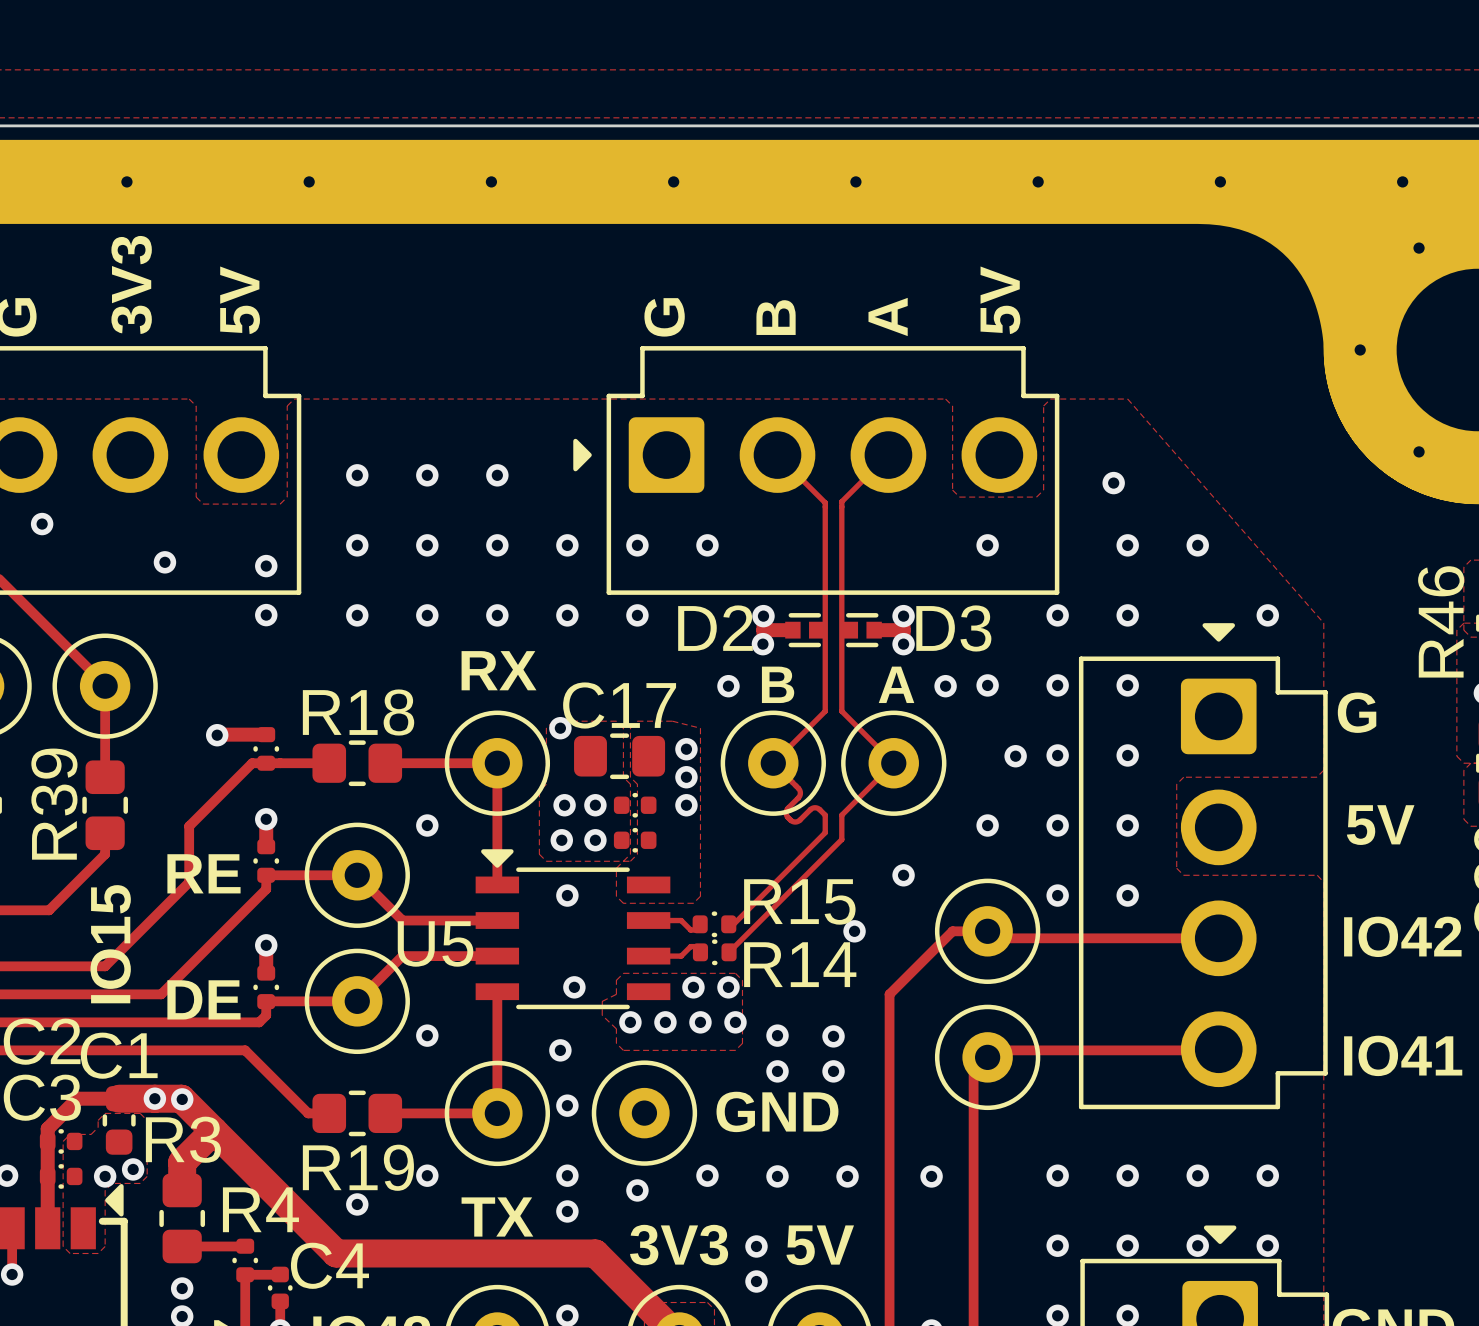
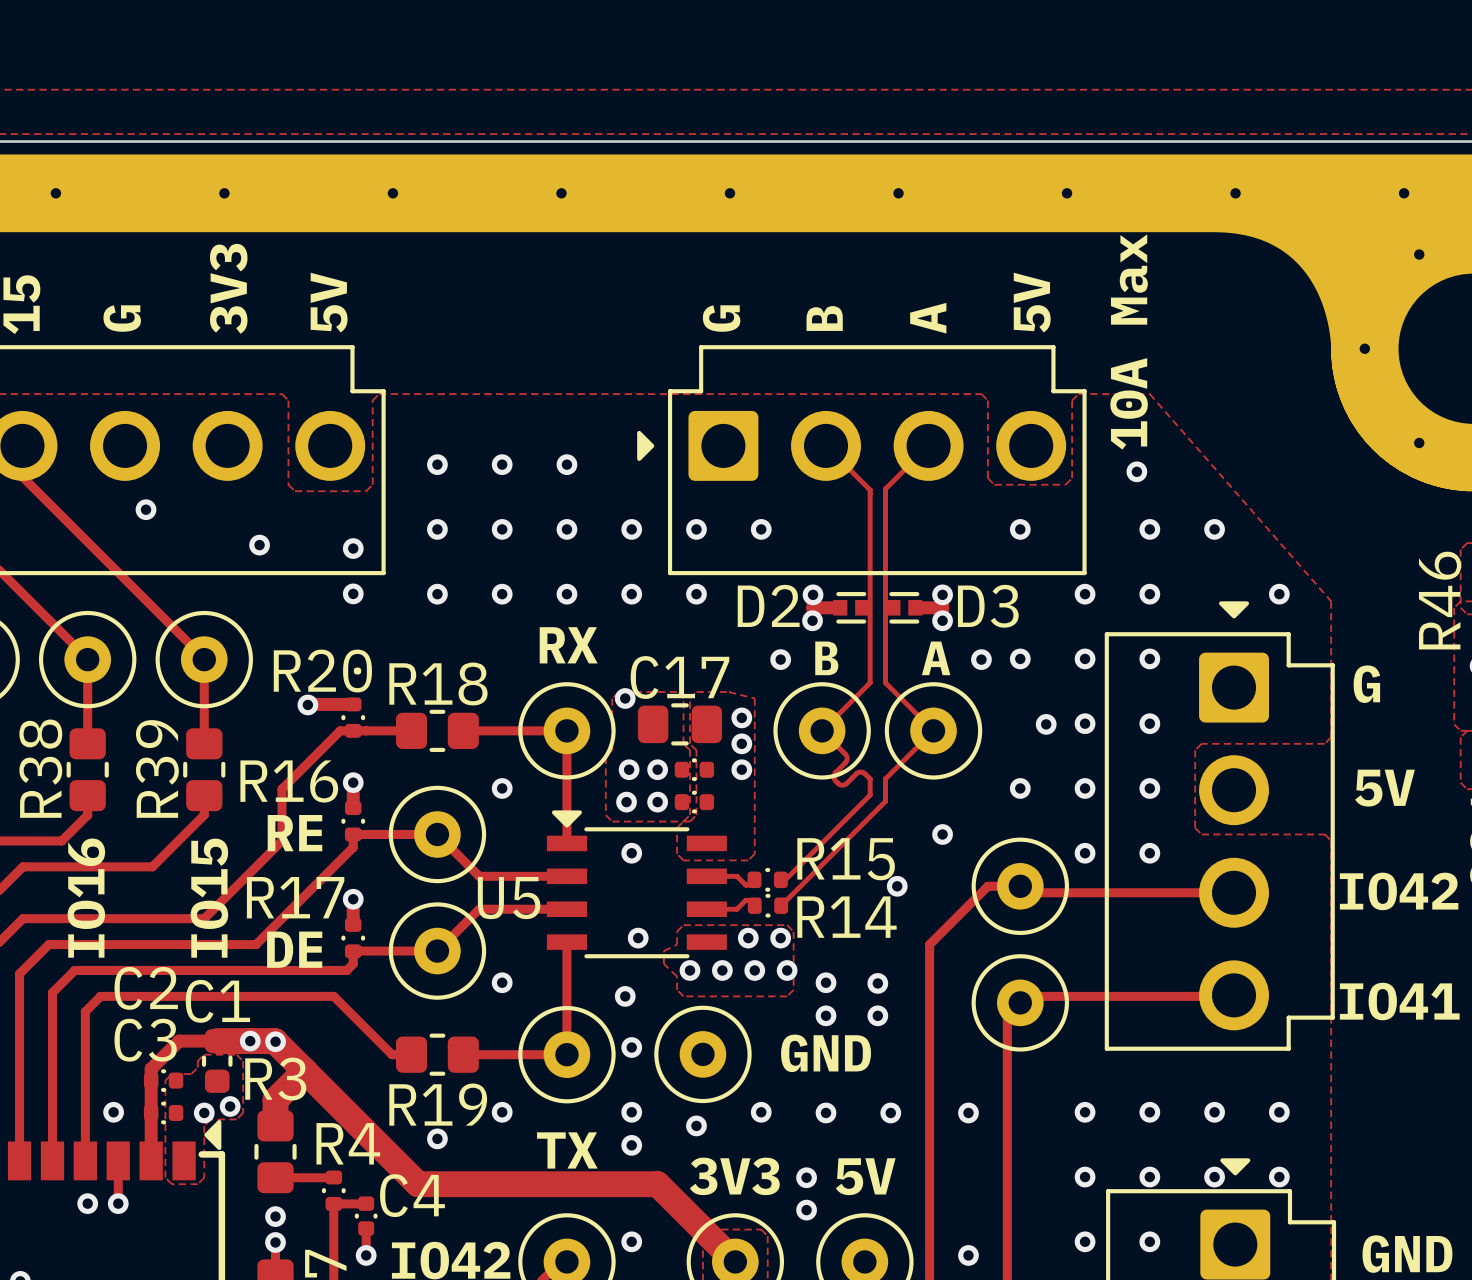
text: none -> 10A Max (1129, 341)
R20 name: none -> R20 (322, 671)
R16 name: none -> R16 (289, 781)
R17 name: none -> R17 (295, 897)

